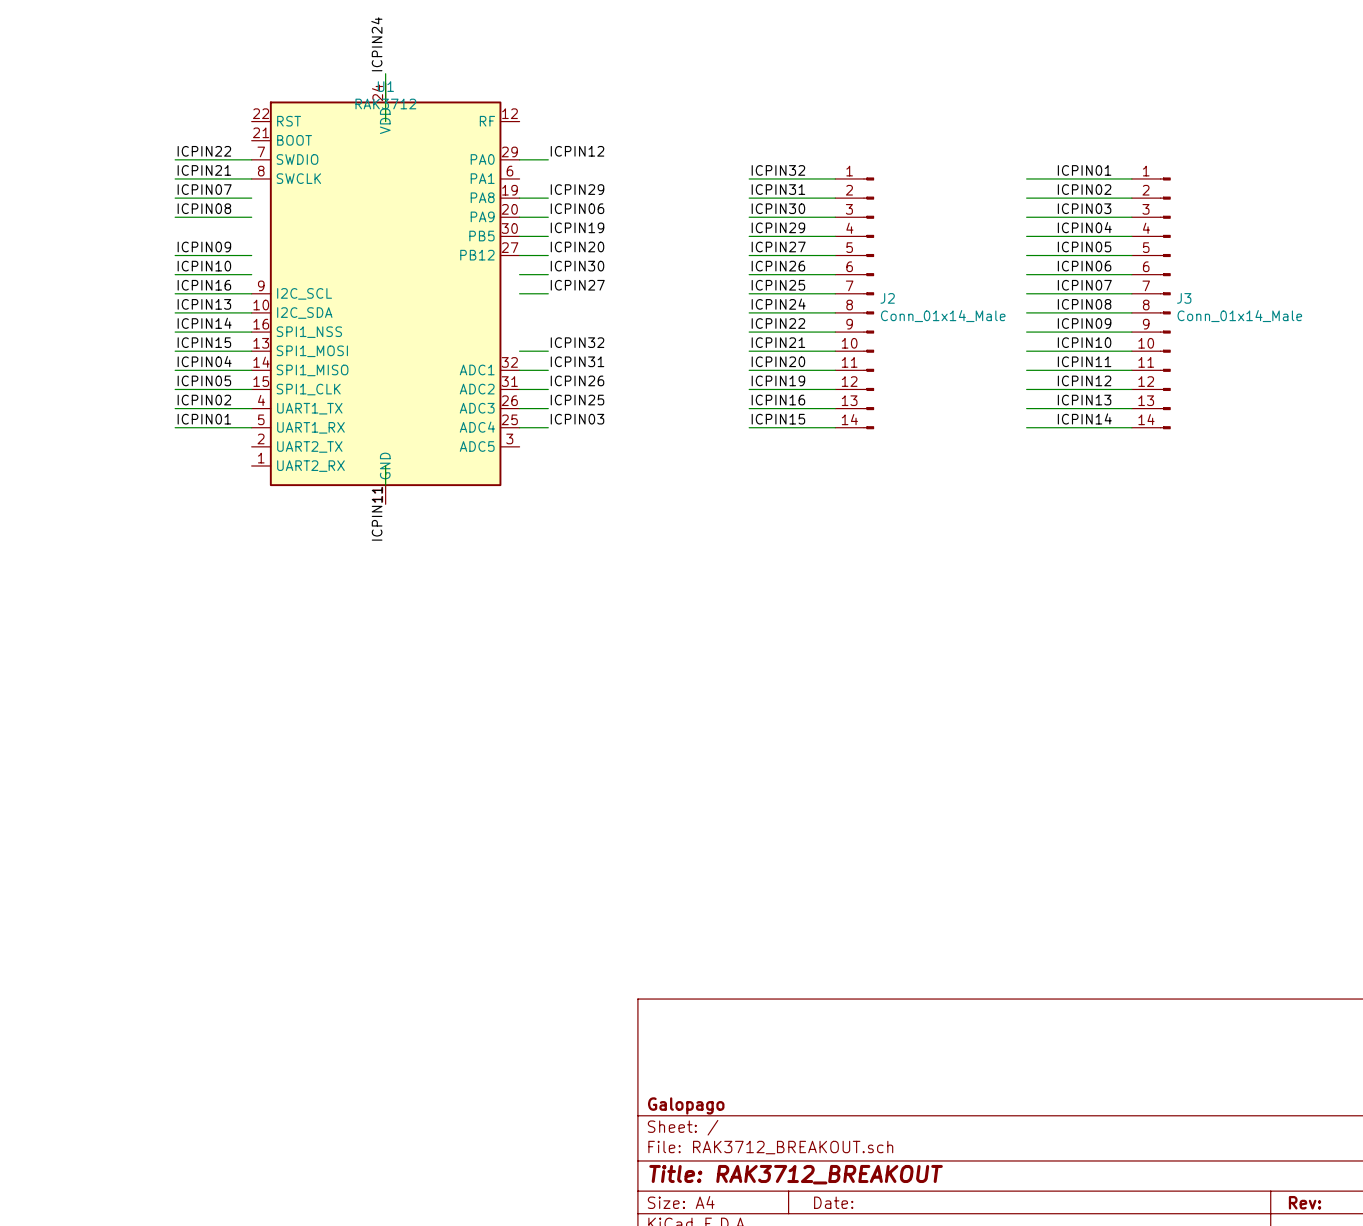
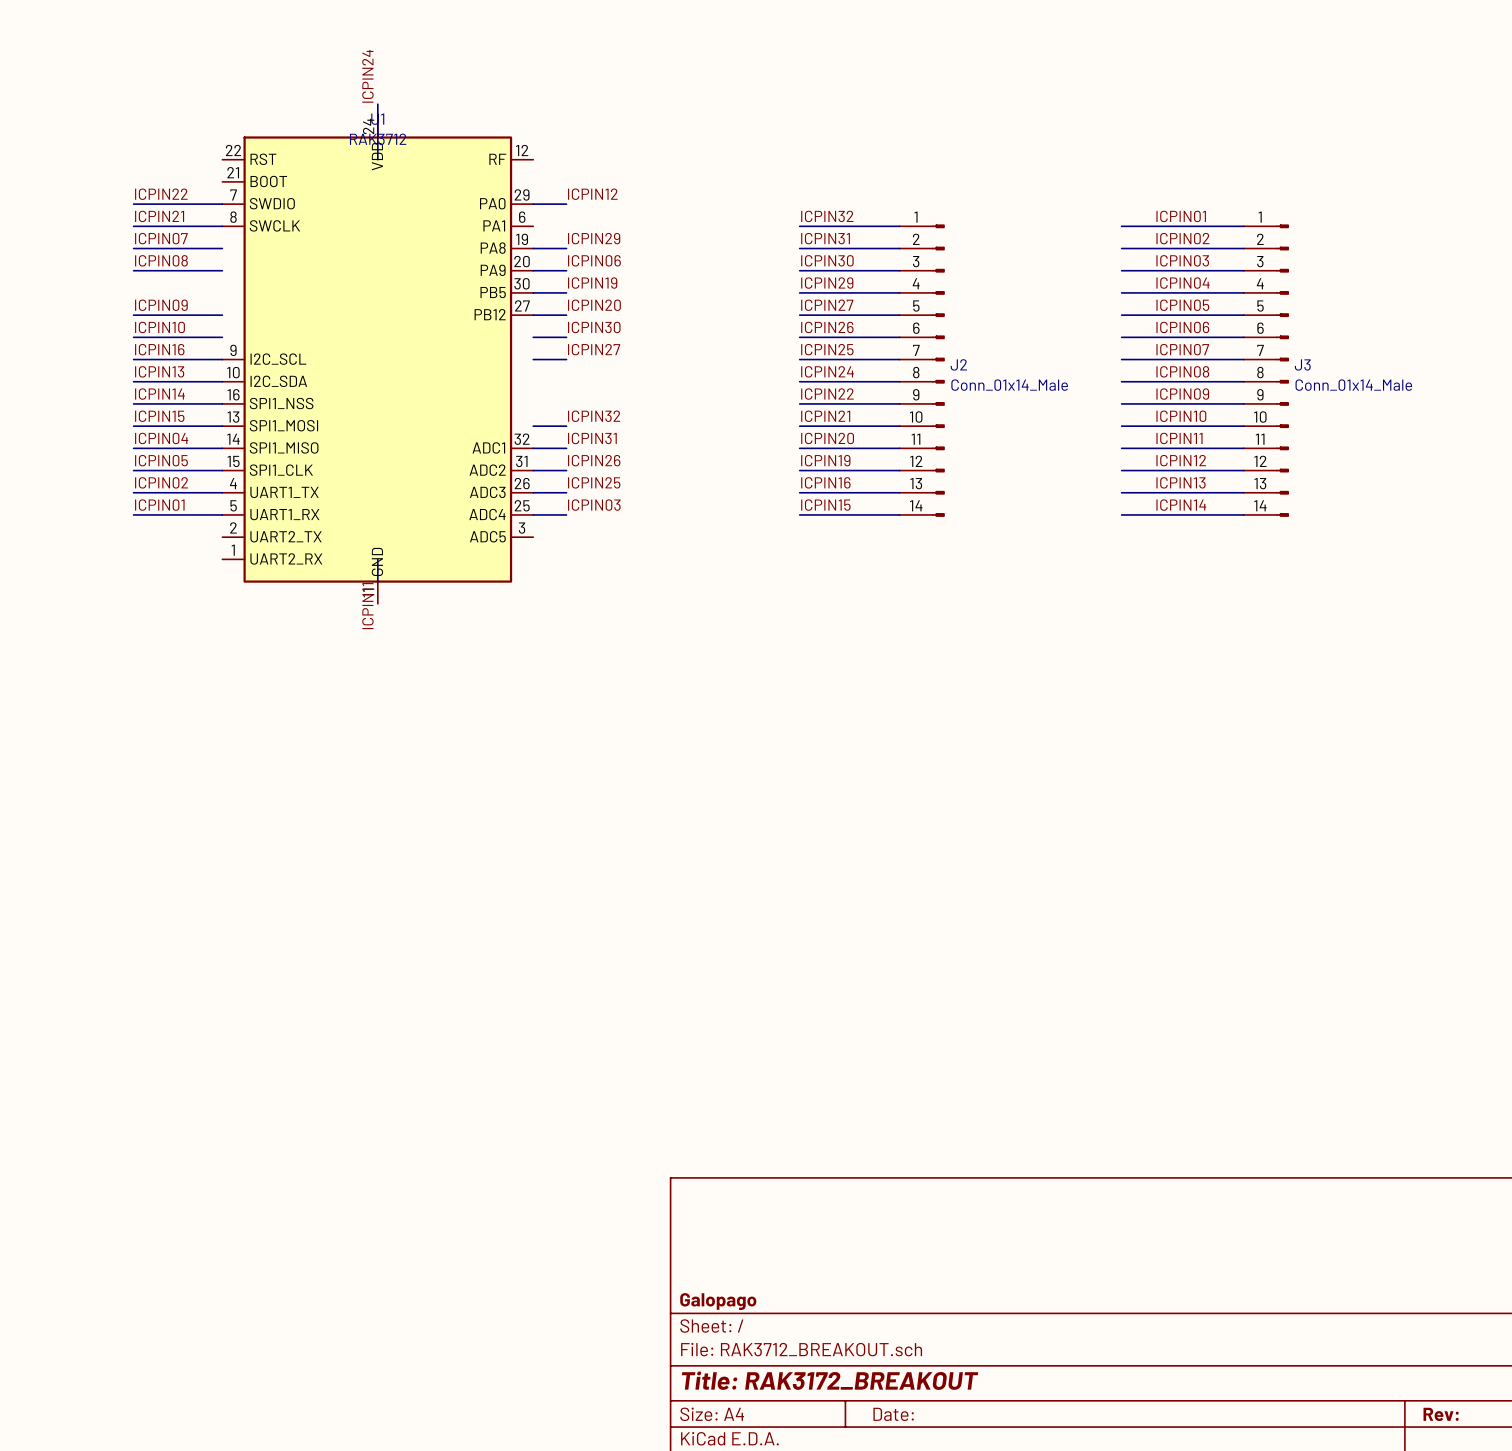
title block: Title: RAK3712_BREAKOUT (796, 1174) -> Title: RAK3172_BREAKOUT (830, 1380)

